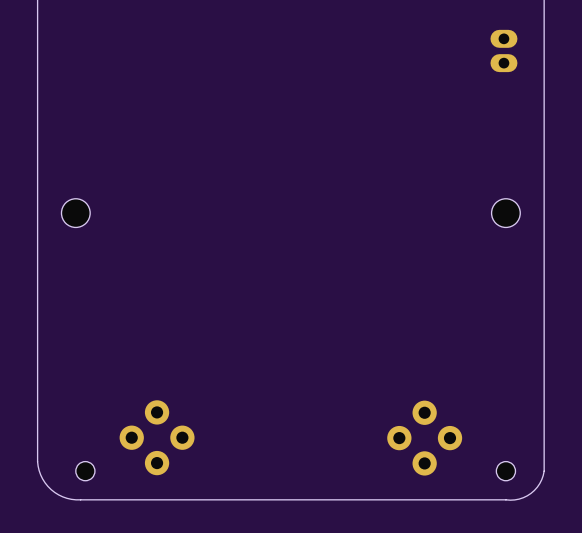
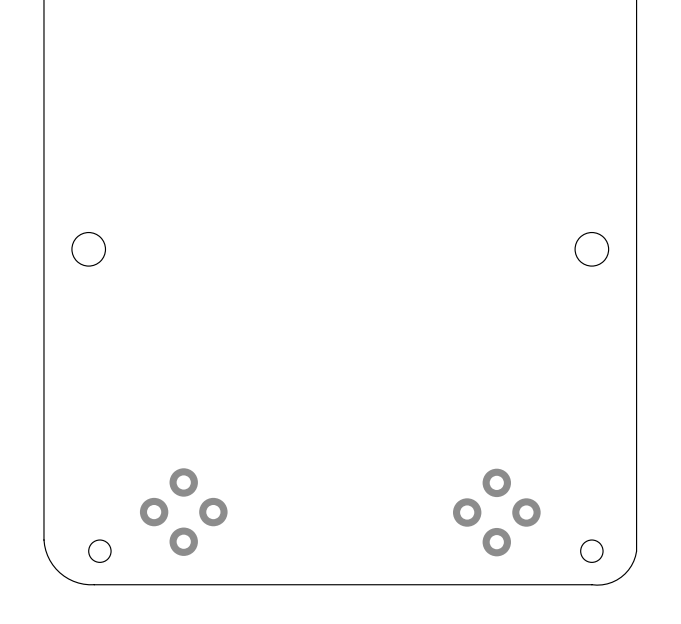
part: (503, 50) -> none

